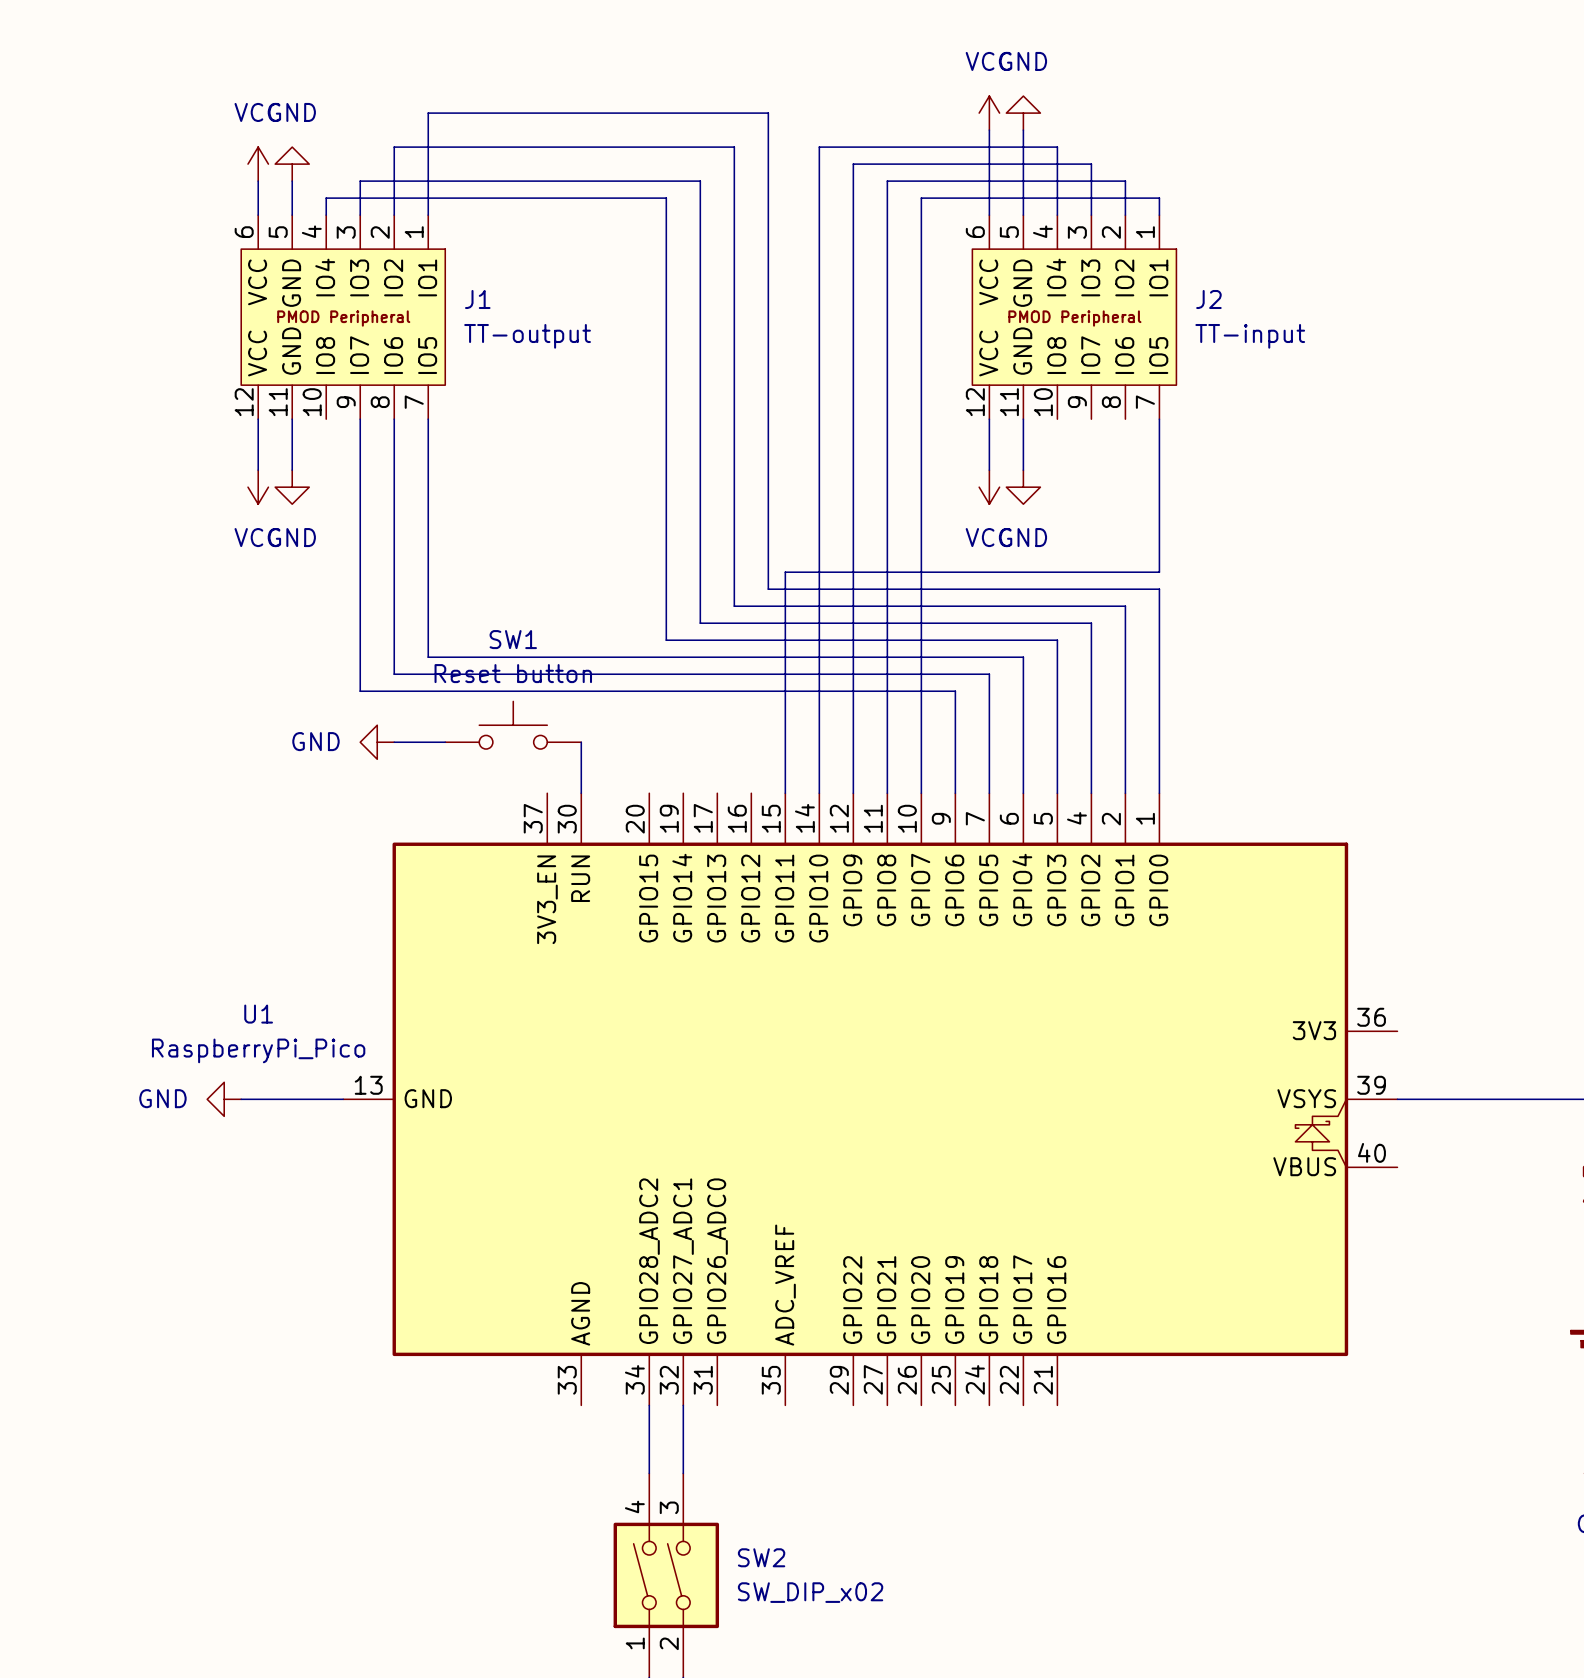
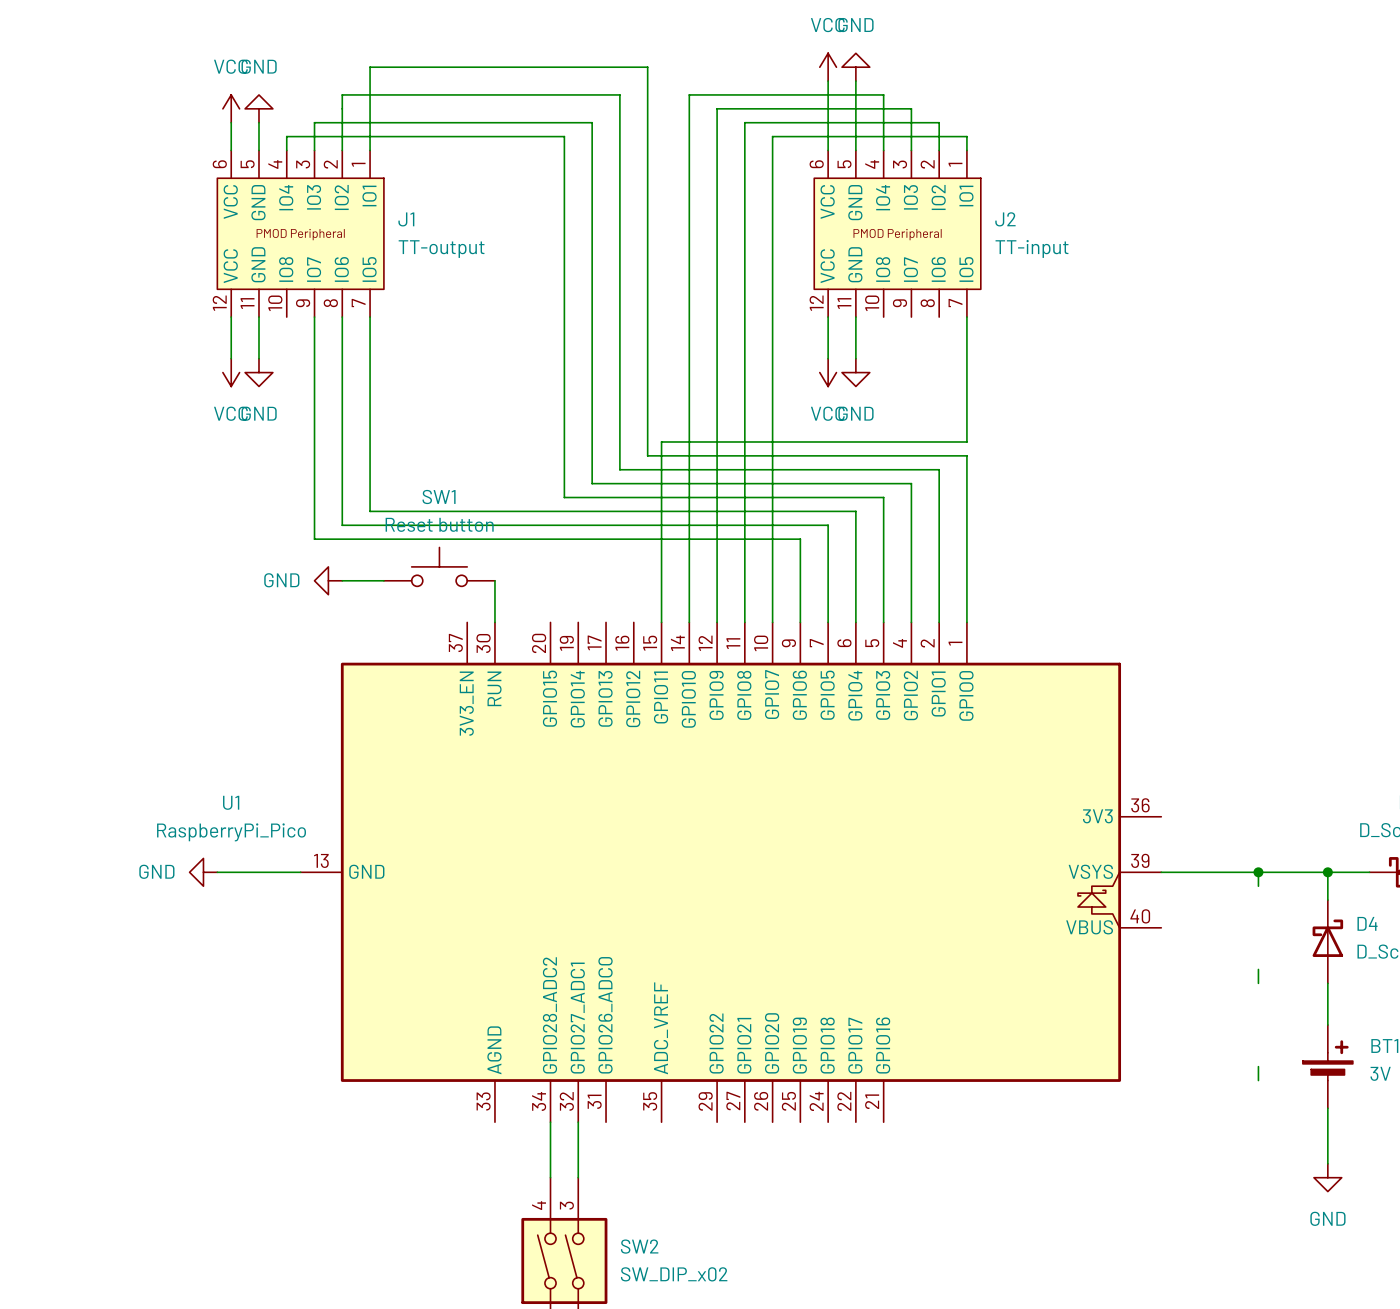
wire: none -> (1258, 872) (1258, 886)
junction: none -> (1258, 872)
wire: none -> (1258, 969) (1258, 983)
wire: none -> (1258, 1066) (1258, 1080)

